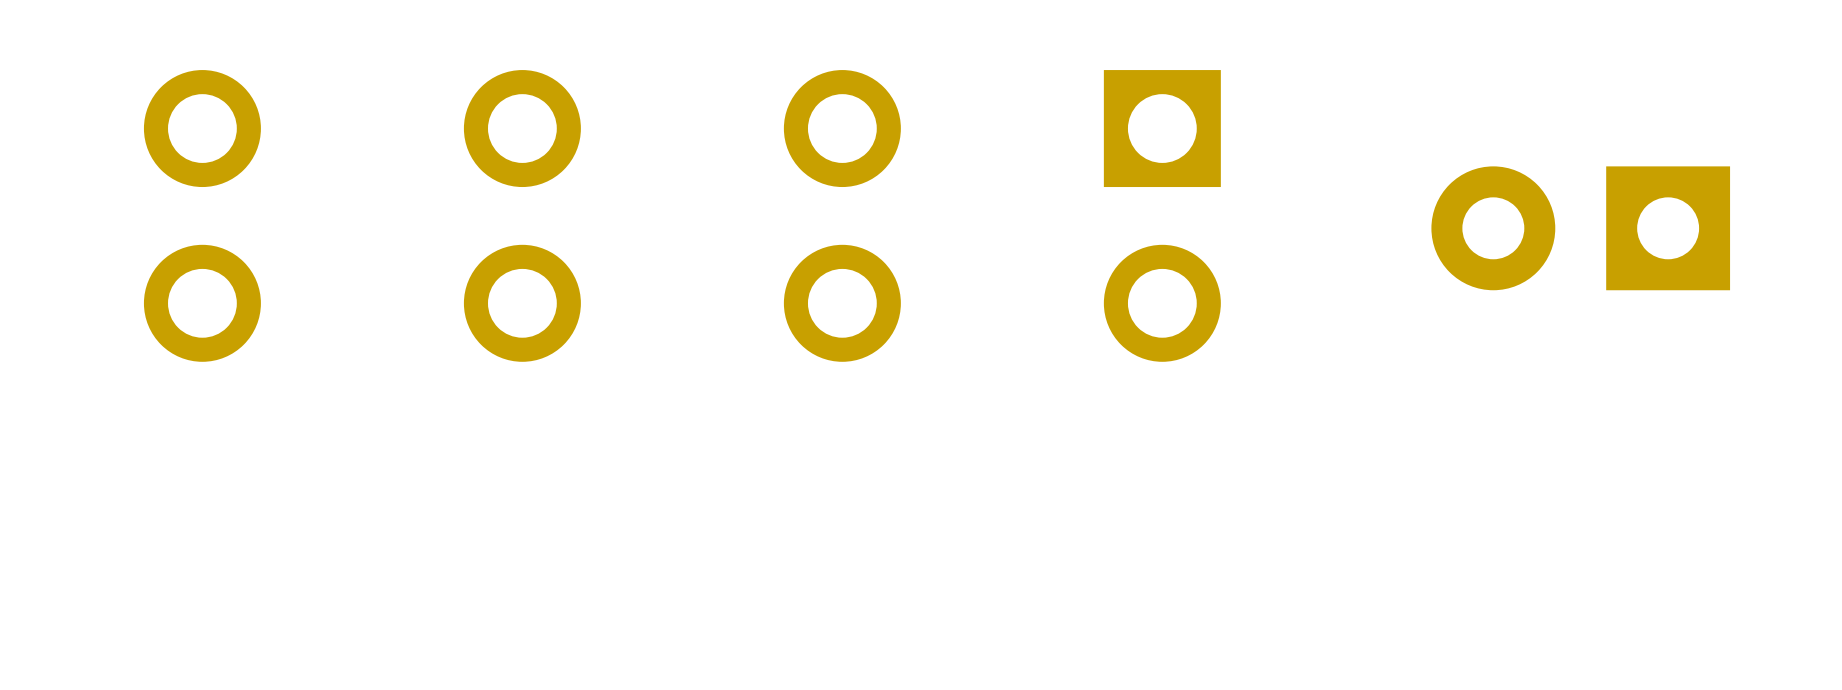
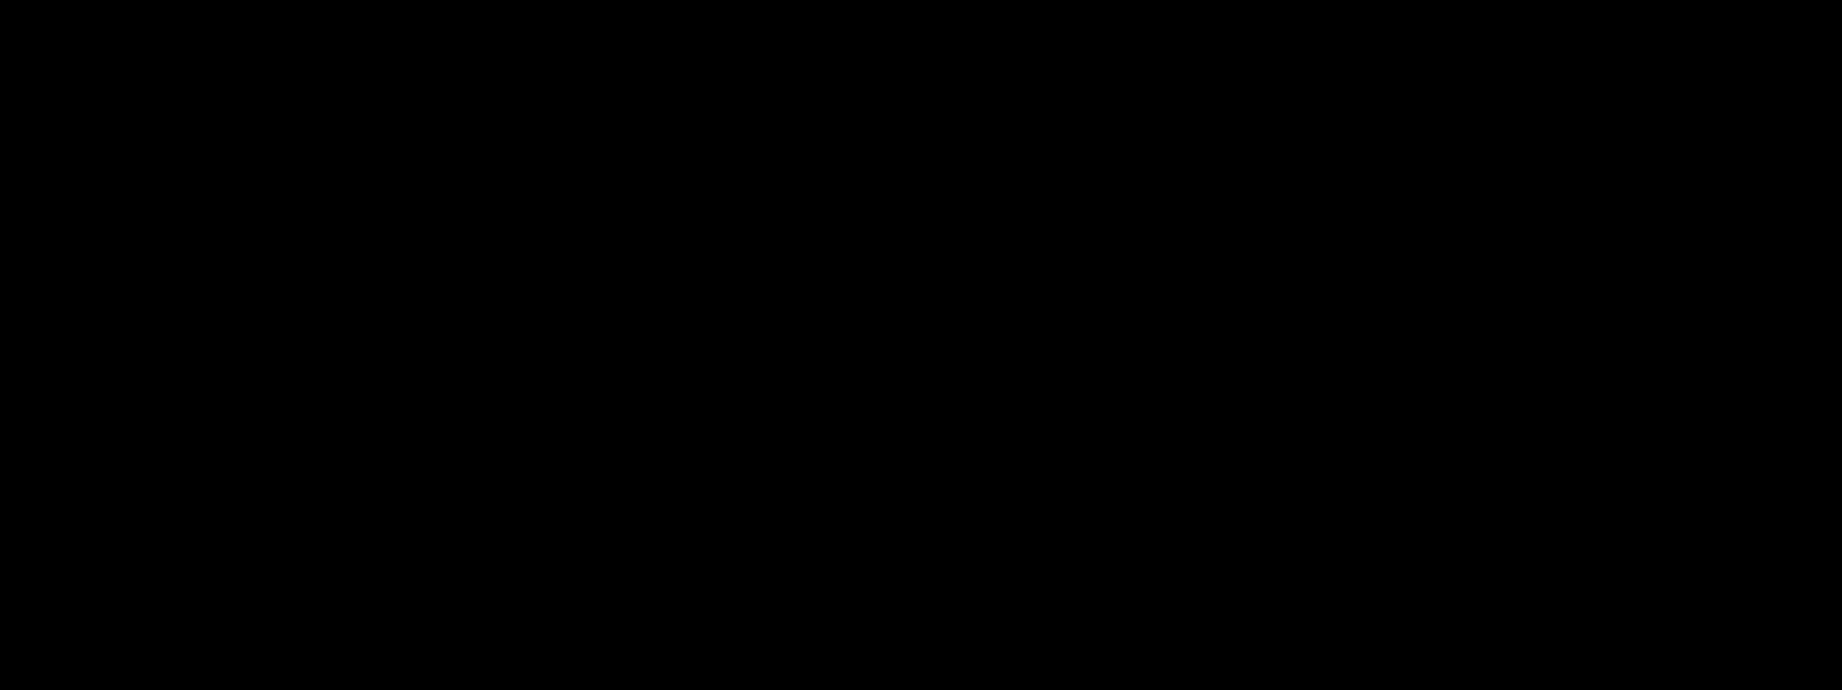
part: (202, 215) -> none
part: (522, 215) -> none
part: (842, 215) -> none
part: (1162, 215) -> none
part: (1580, 228) -> none

